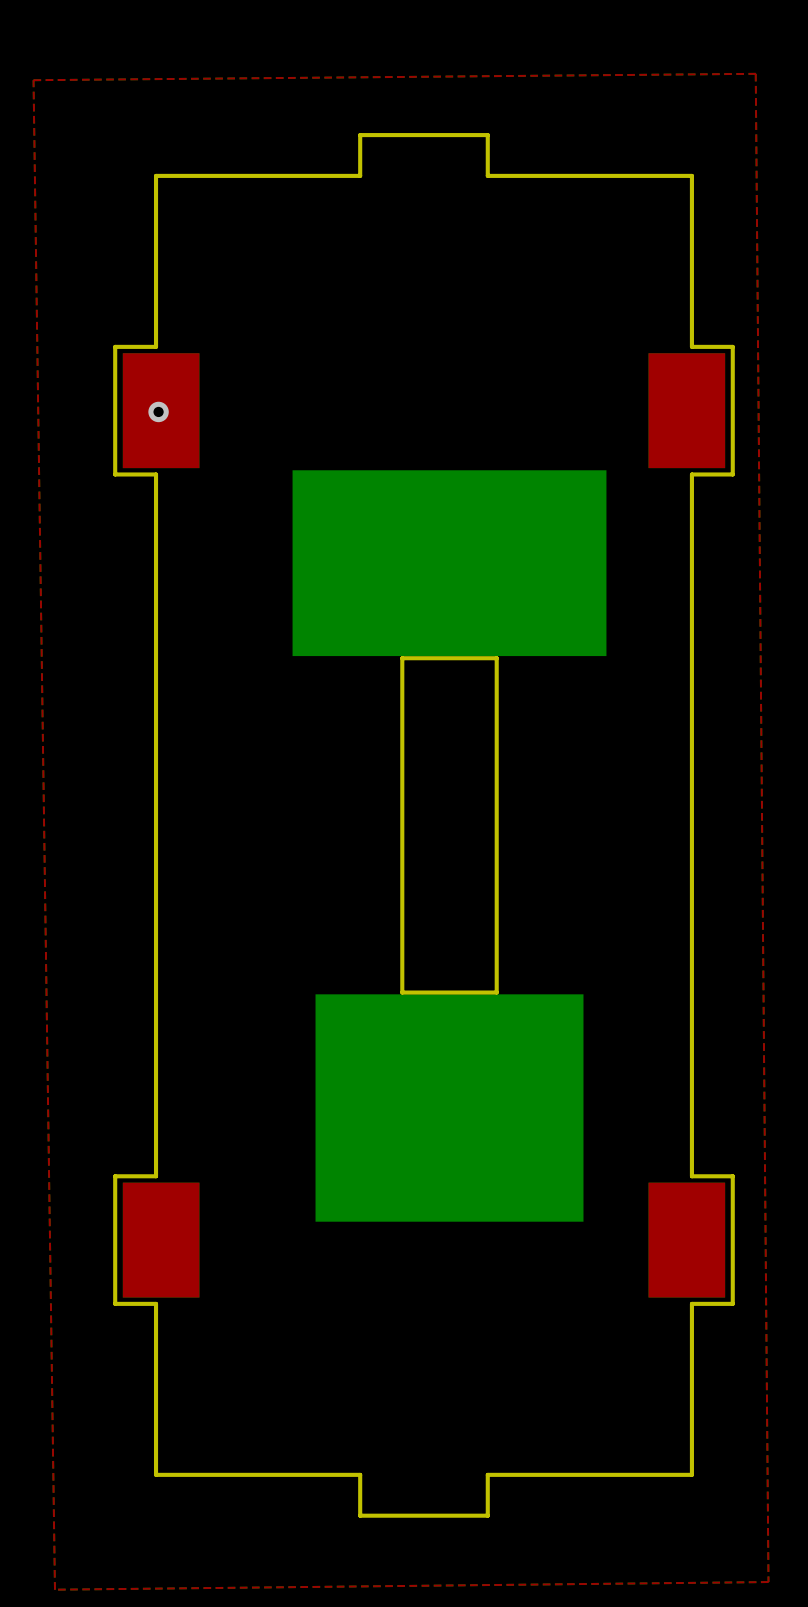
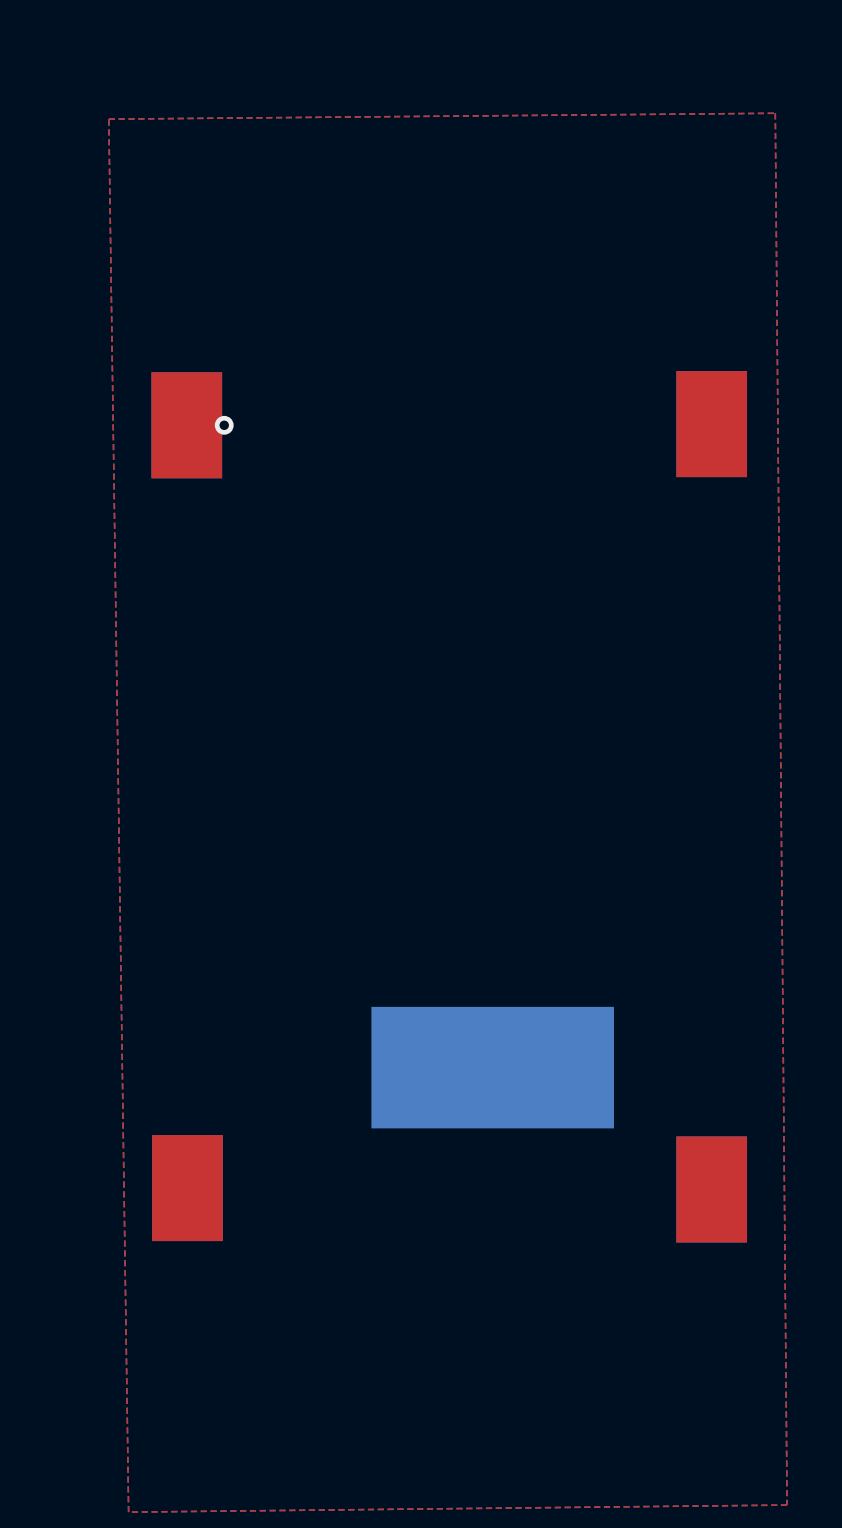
board edge: (360, 135) (360, 175) (156, 175) (156, 346) (115, 346) (115, 474) (156, 474) (156, 1176) (115, 1176) (115, 1303) (156, 1303) (156, 1474) (360, 1474) (360, 1515) (487, 1515) (487, 1474) (691, 1474) (691, 1303) (732, 1303) (732, 1176) (691, 1176) (691, 474) (732, 474) (732, 346) (691, 346) (691, 175) (487, 175) (487, 135) (360, 135) -> none
part position: (161, 410) -> (186, 425)
part: (449, 563) -> none
board edge: (402, 658) (402, 992) (496, 992) (496, 658) (402, 658) -> none
part footprint: [315, 994, 584, 1222] -> [371, 1006, 614, 1129]
part position: (161, 1240) -> (187, 1188)

